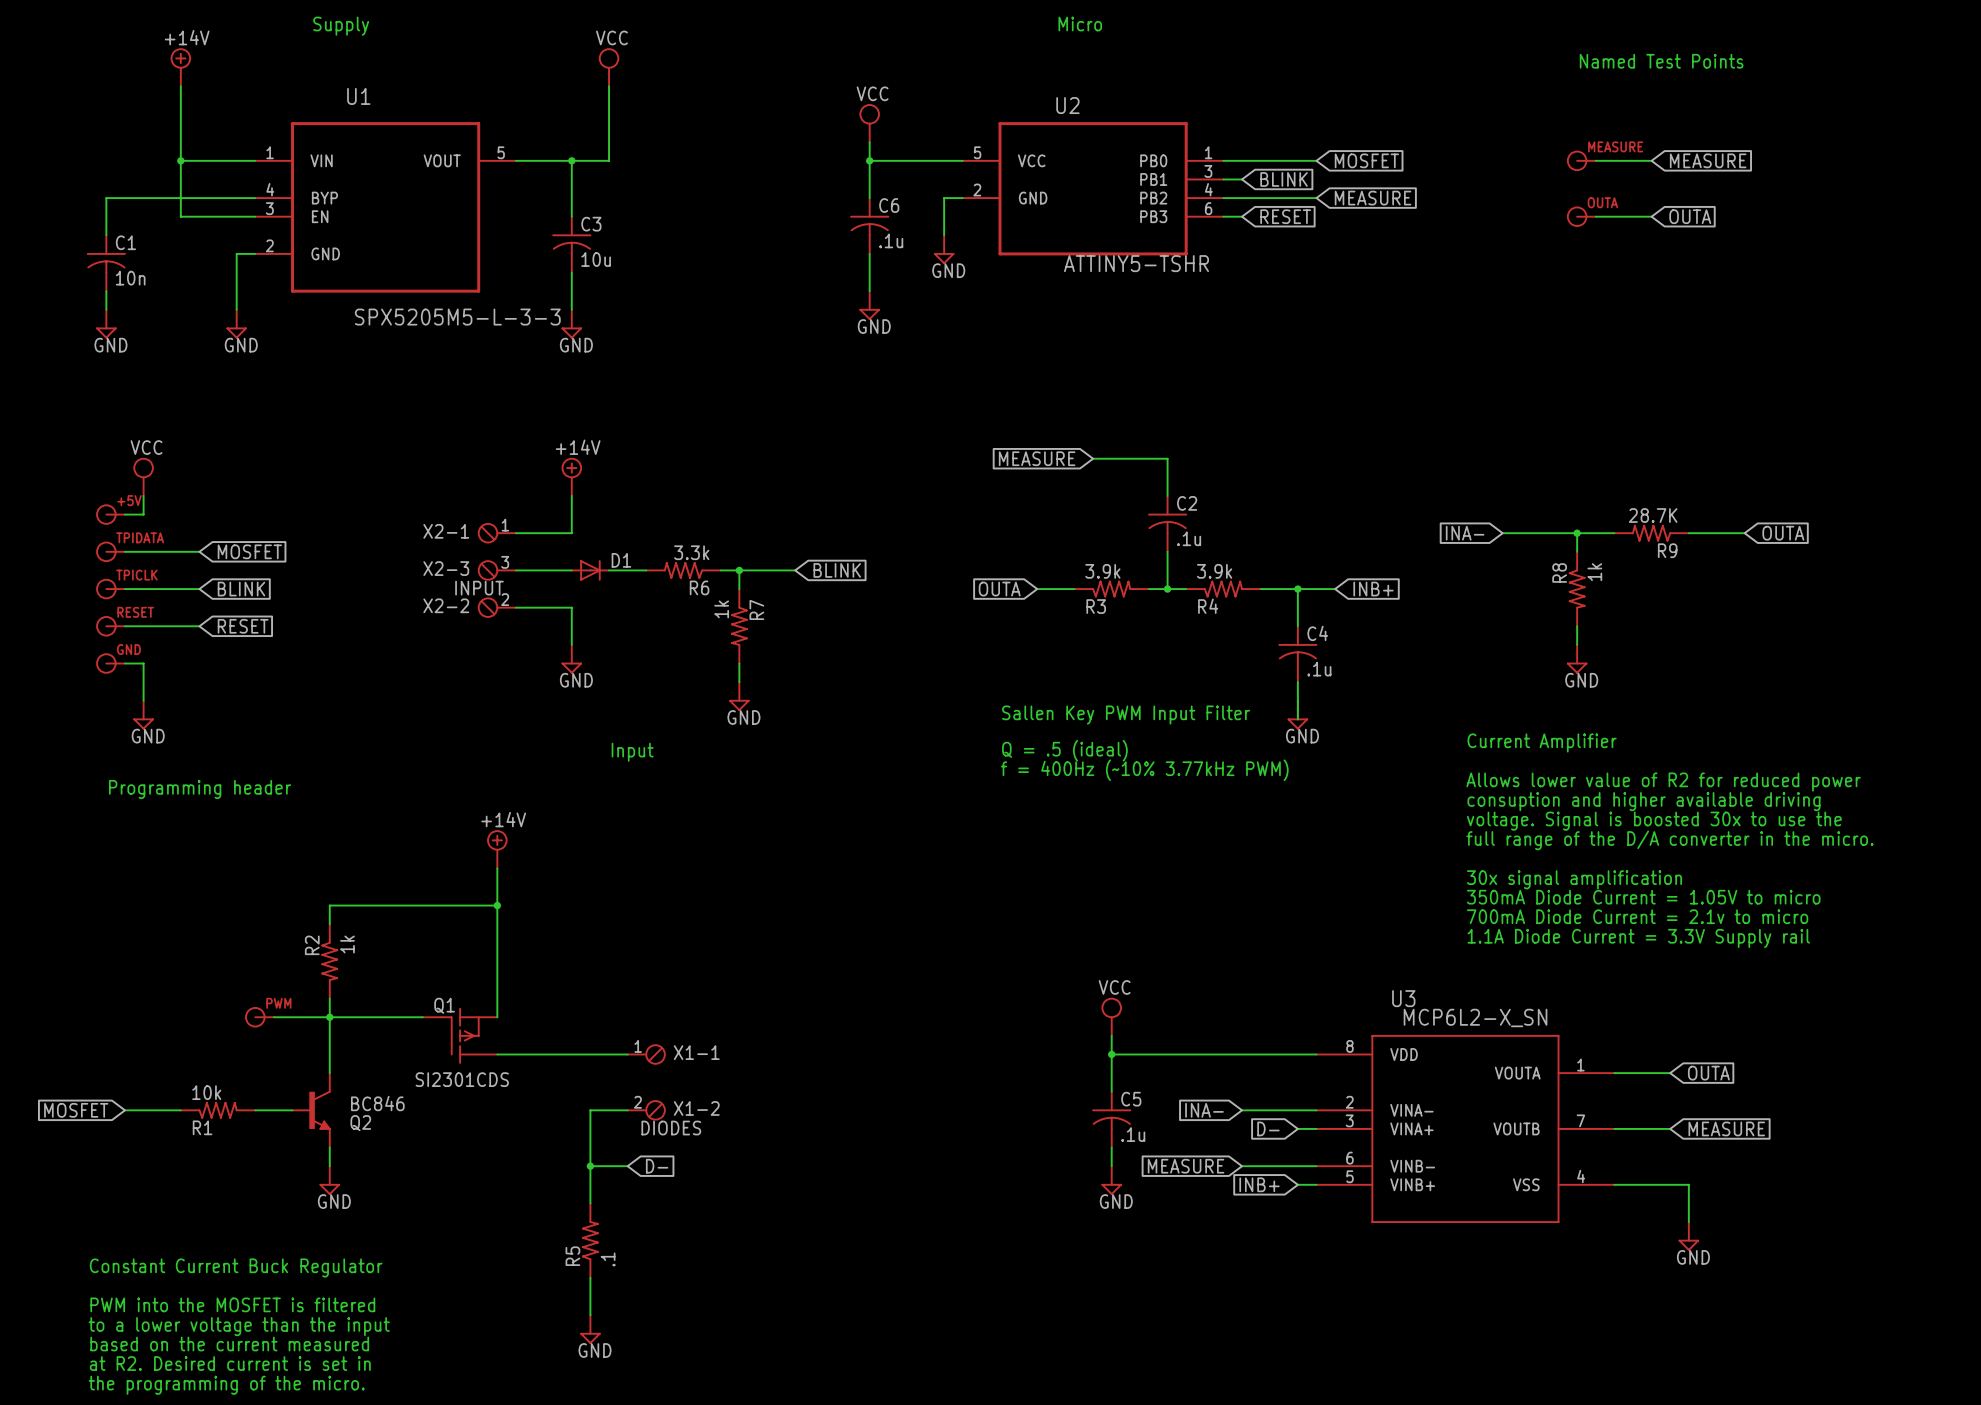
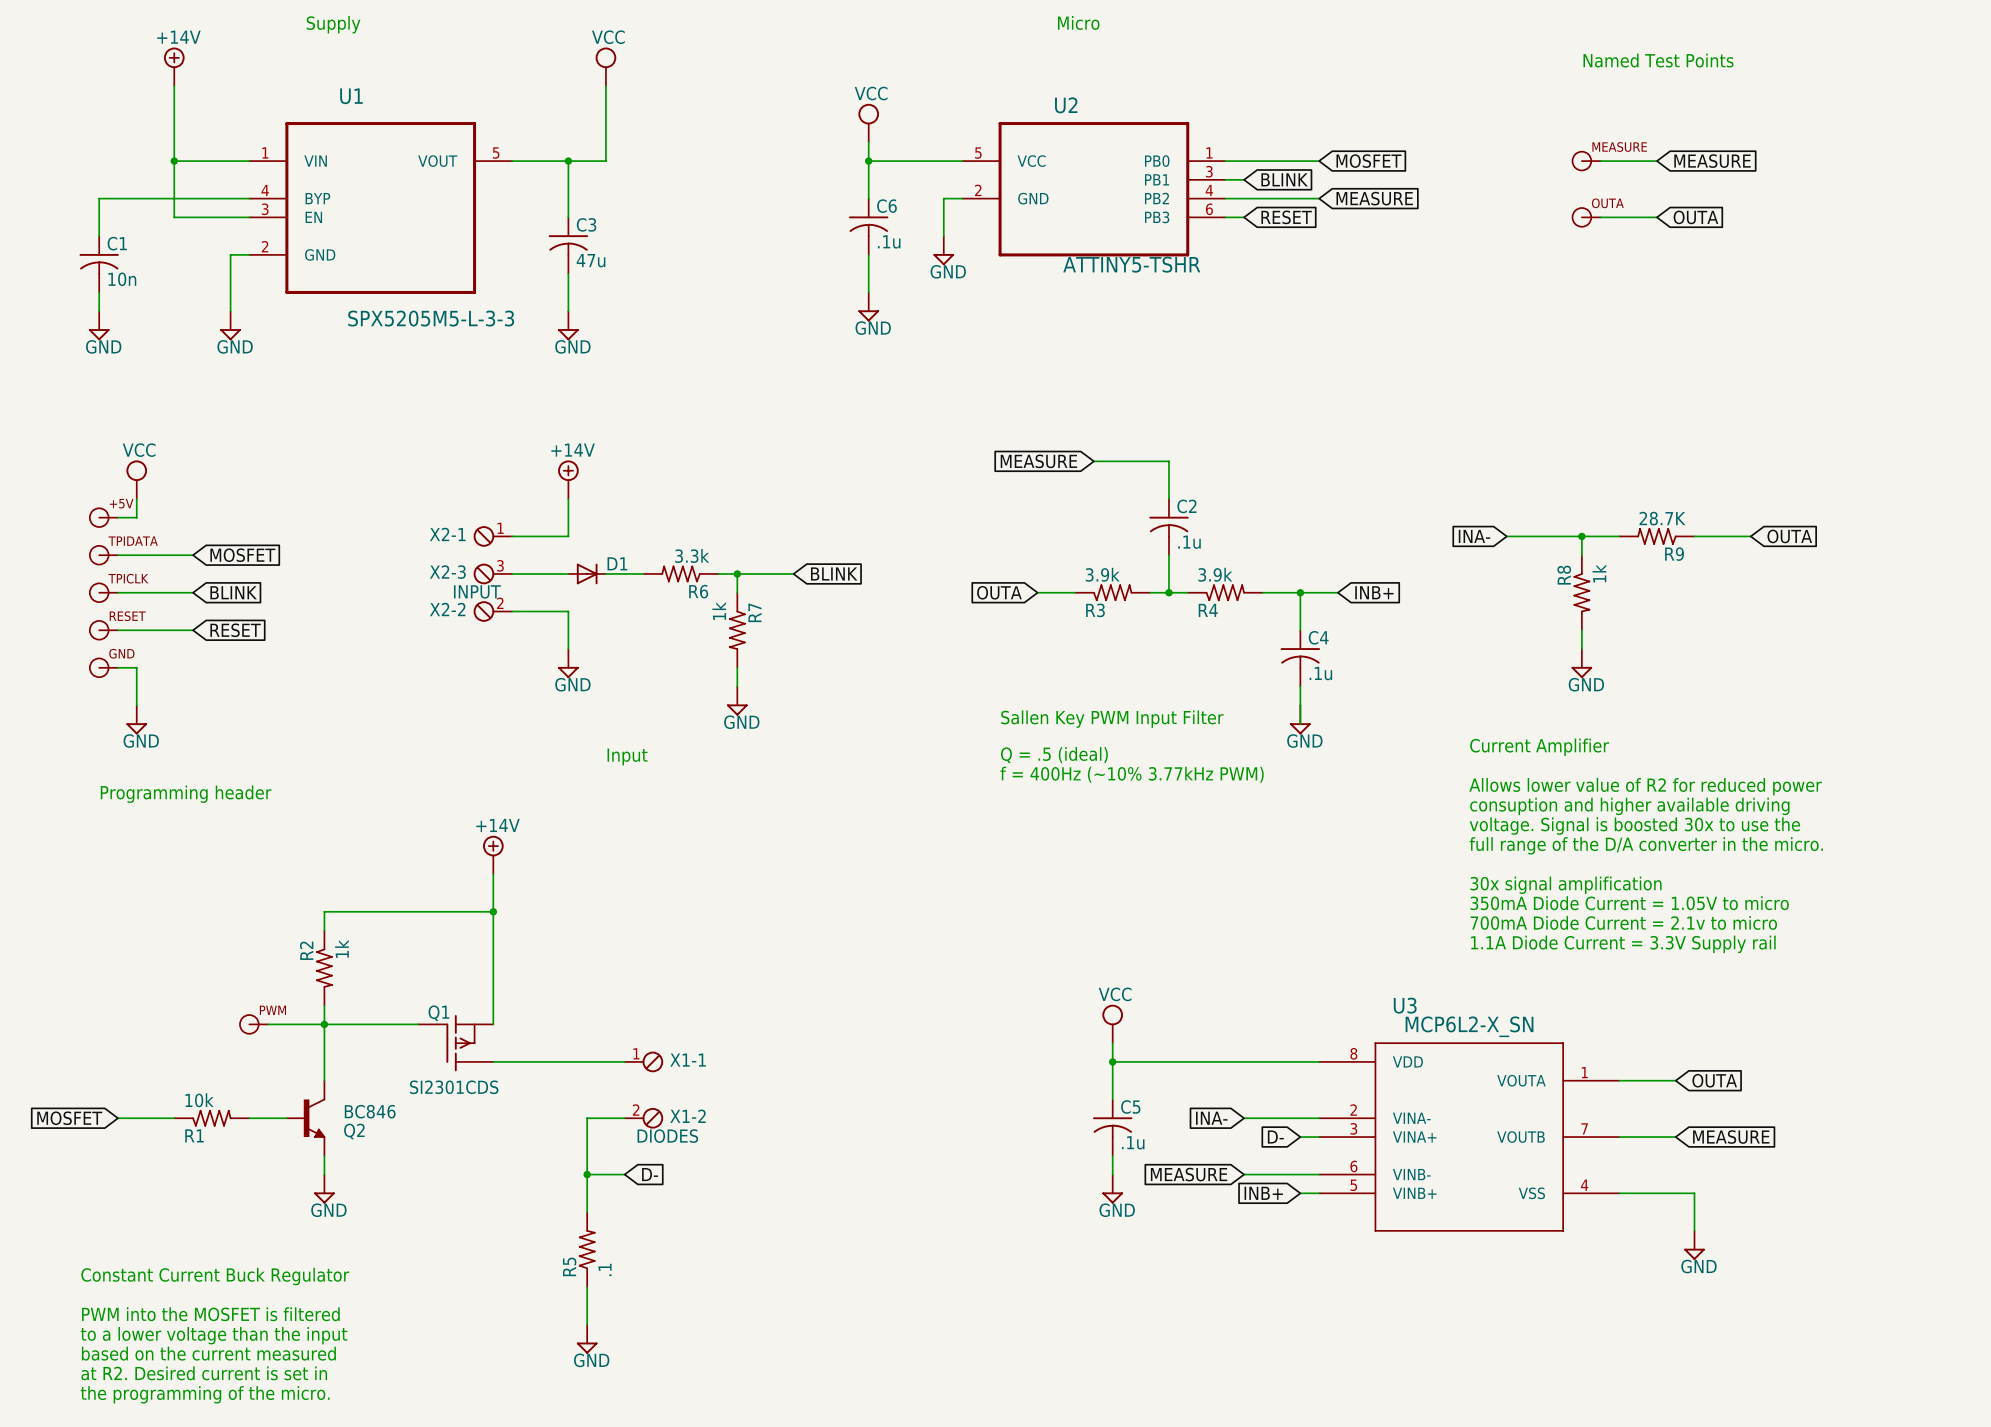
C3 value: 10u (596, 259) -> 47u (591, 260)

